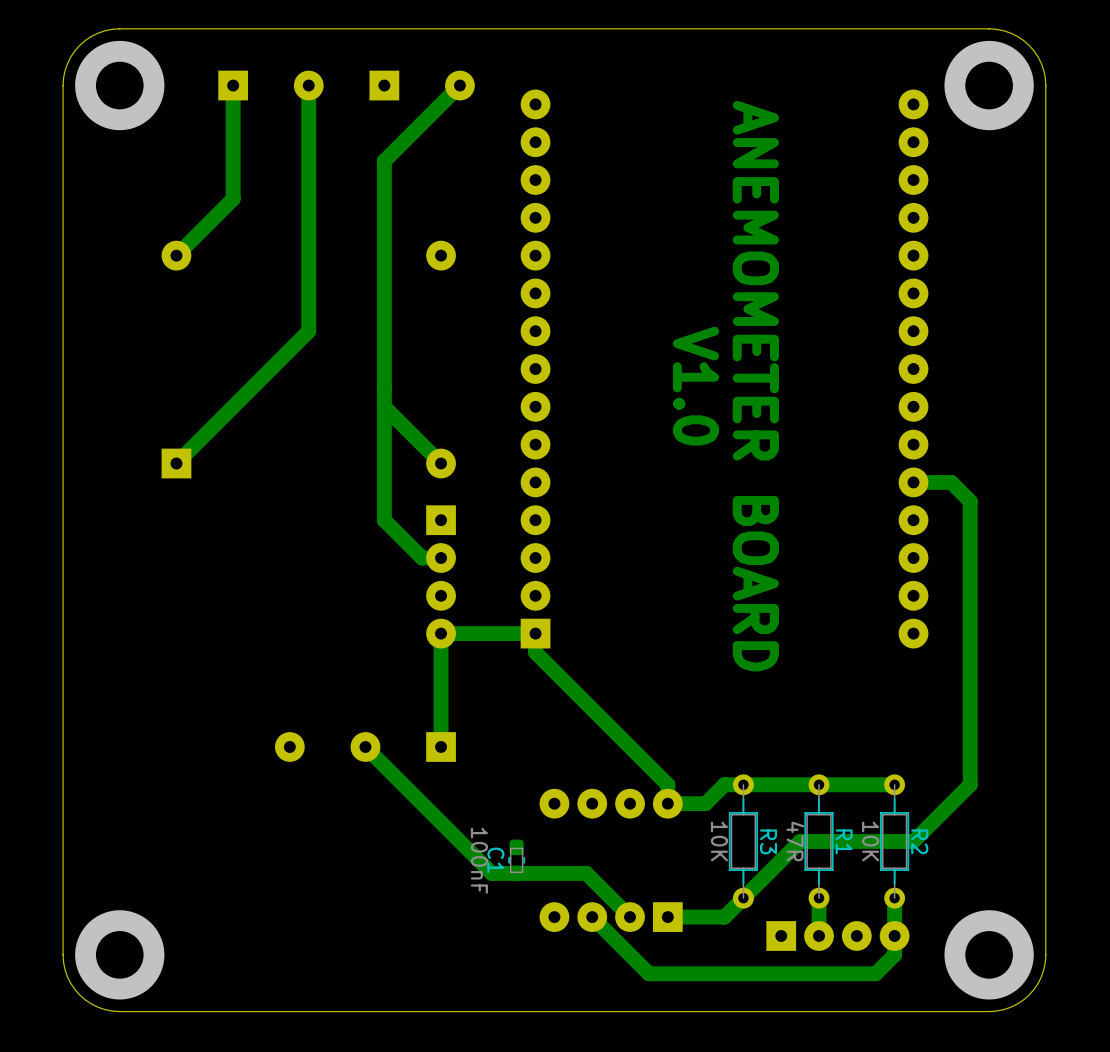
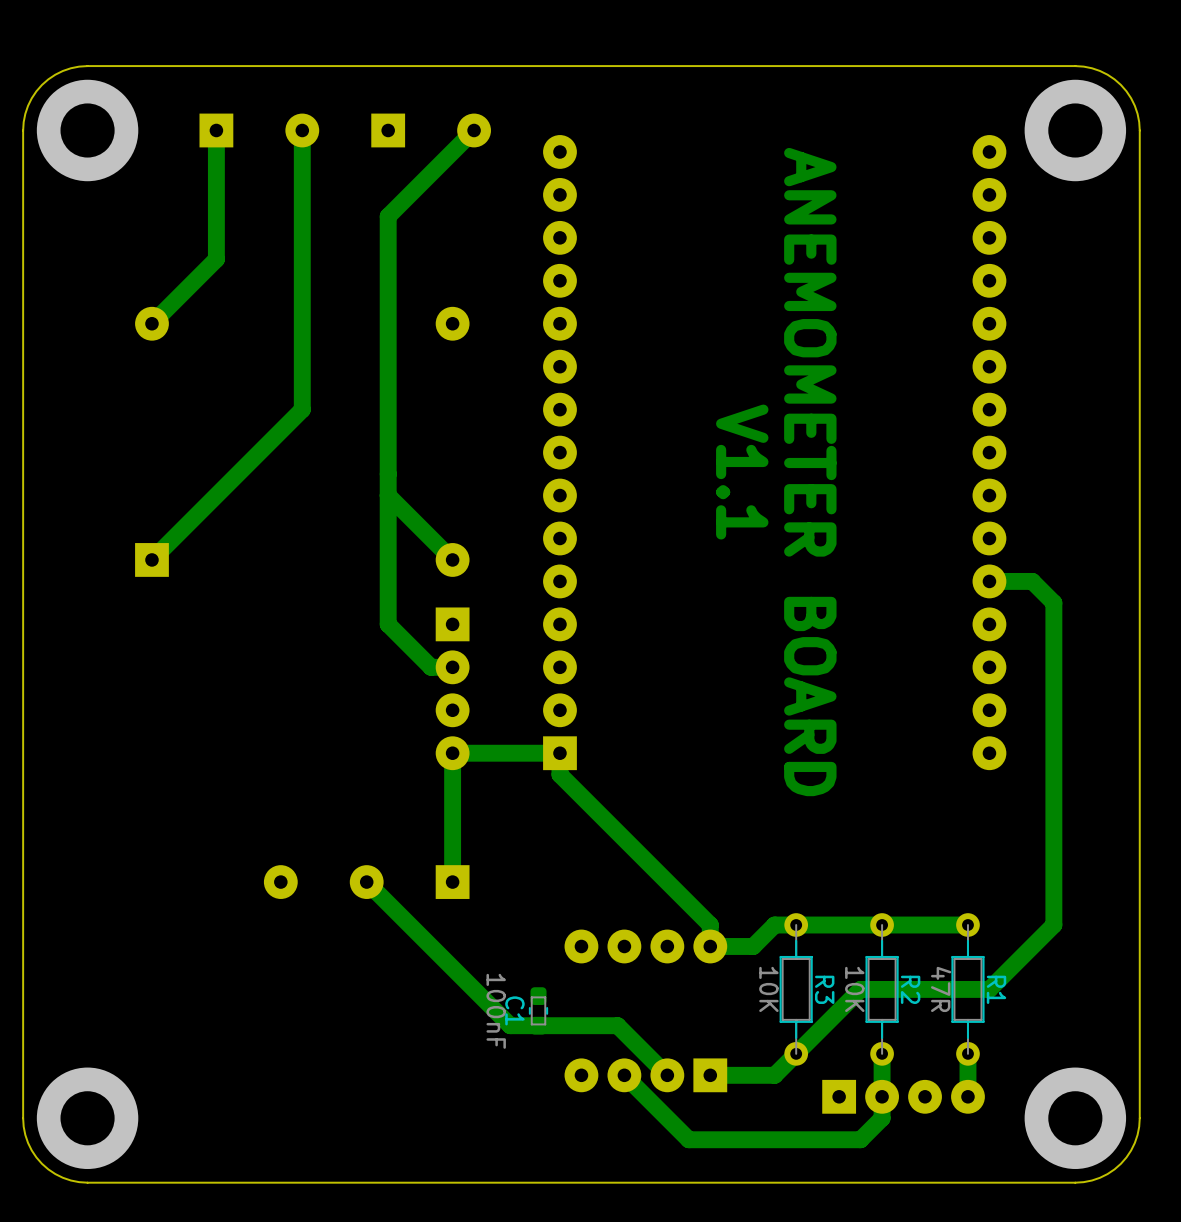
text: V1.0 (695, 386) -> V1.1 (742, 472)
R1 value: 47R (795, 841) -> 10K (854, 989)
R1 name: R1 (844, 841) -> R2 (910, 989)
R2 value: 10K (870, 841) -> 47R (941, 989)
R2 name: R2 (919, 841) -> R1 (996, 989)
bottom track: (894, 935) (894, 954) (875, 973) (800, 973) -> (882, 1096) (882, 1118) (860, 1139)

